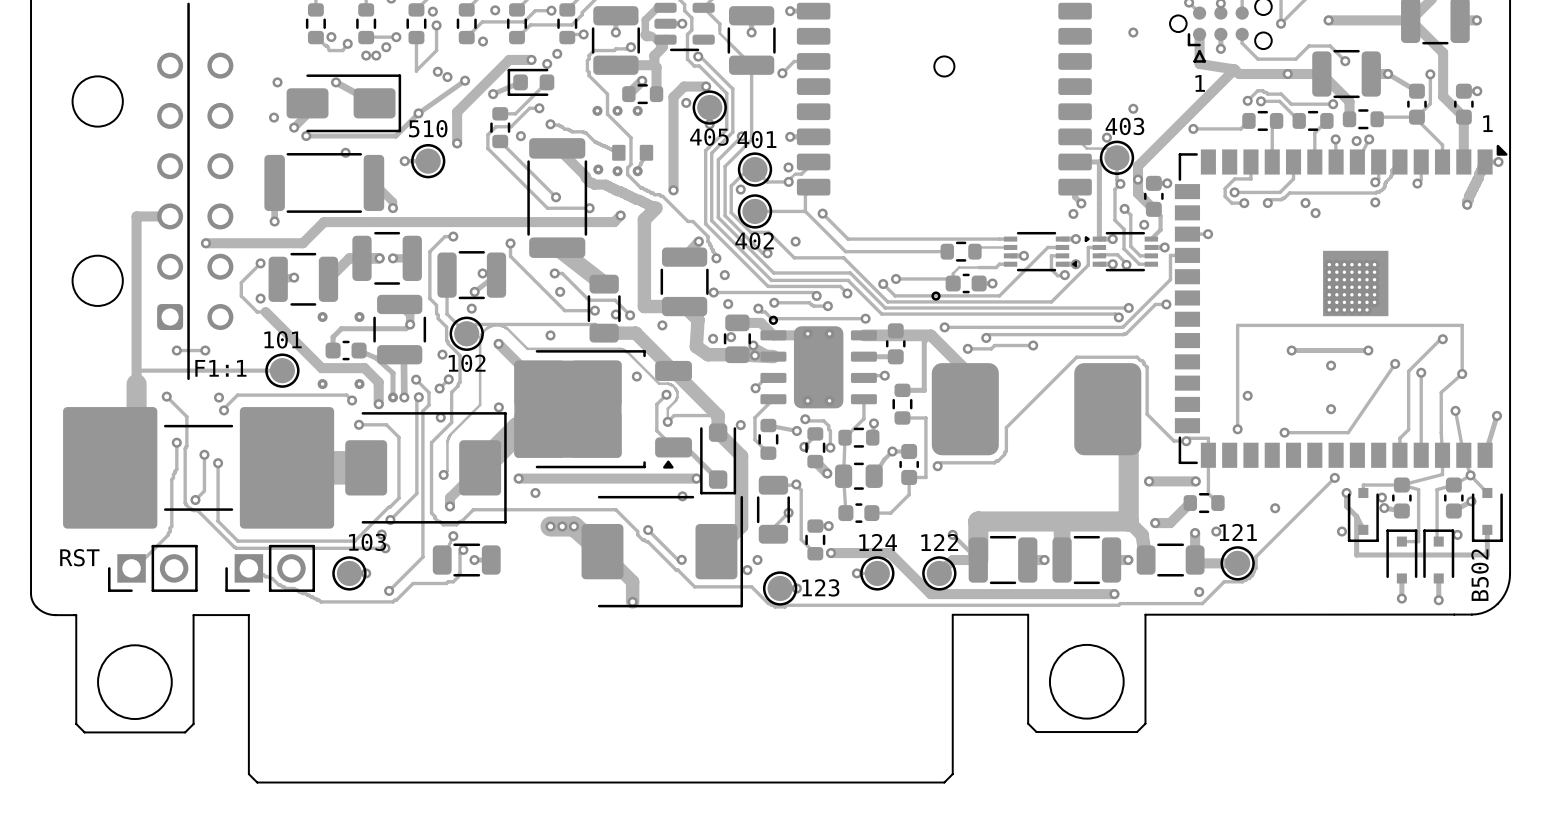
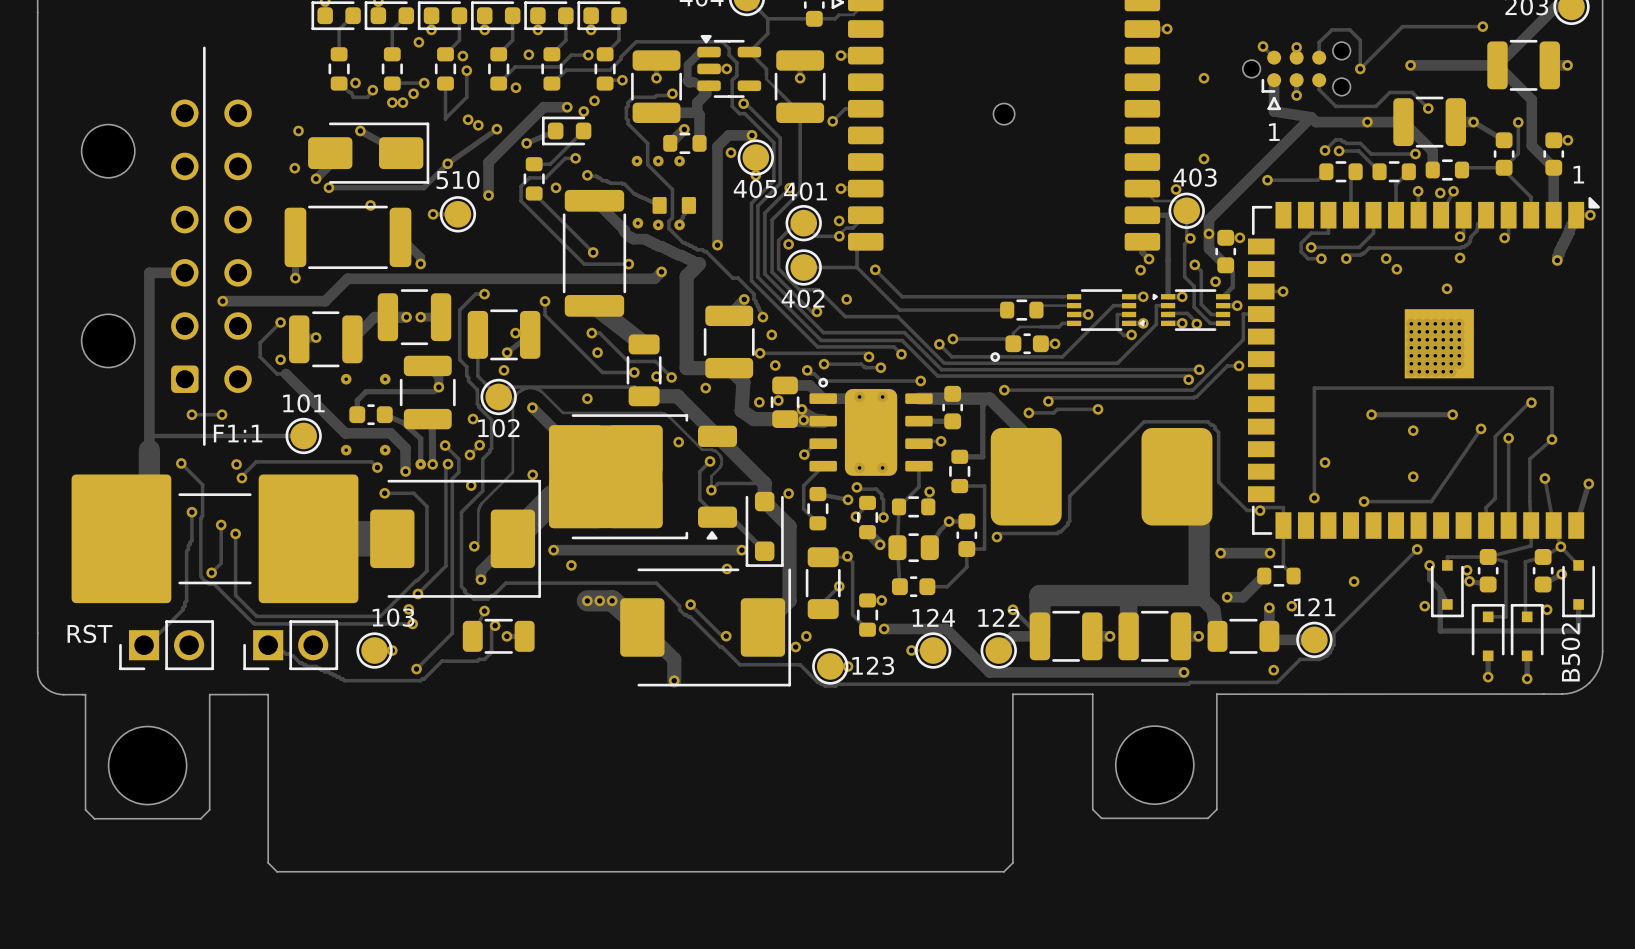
via: none -> (1447, 288)

